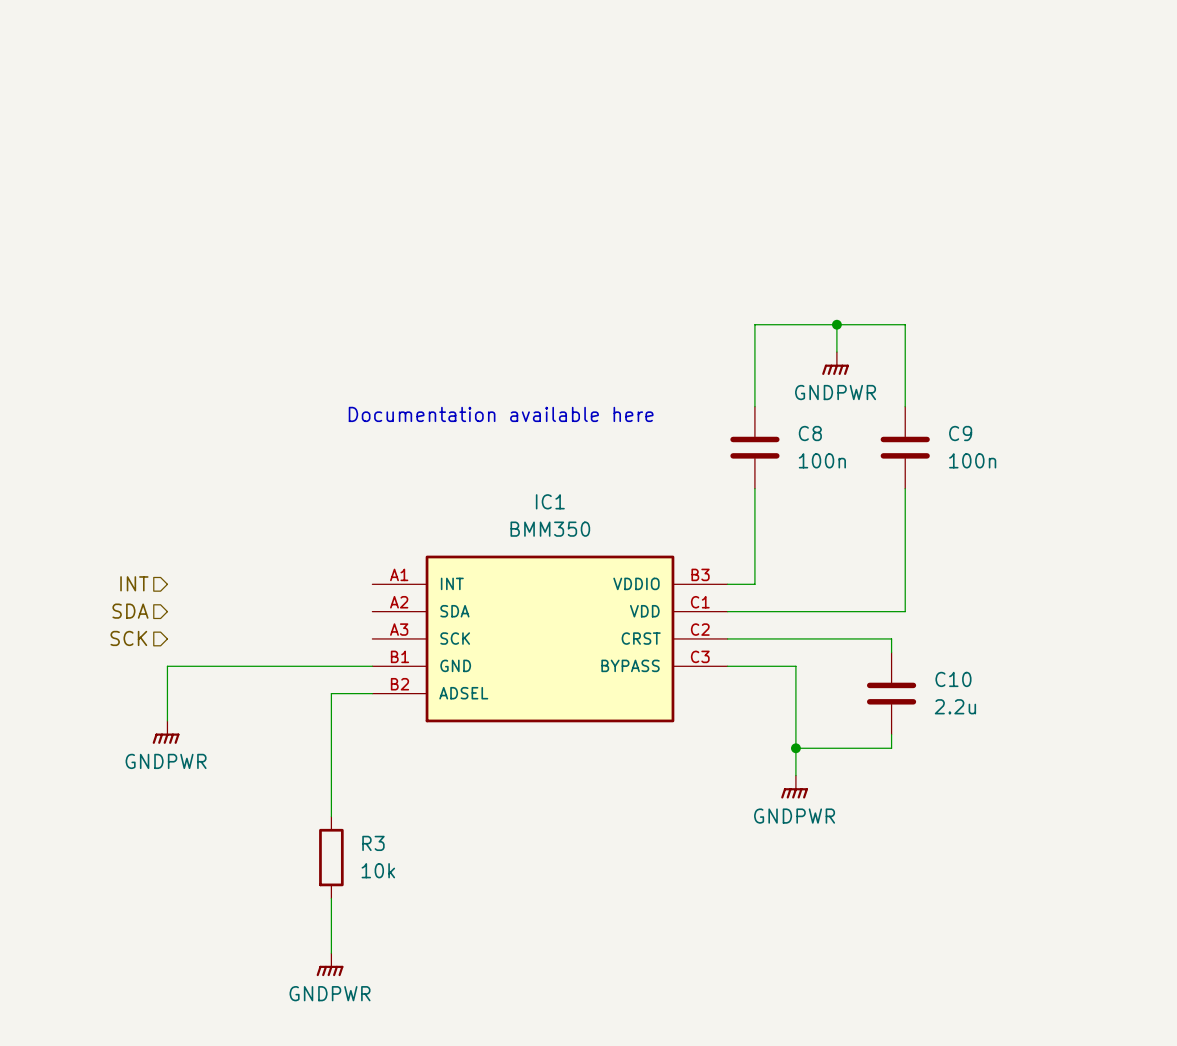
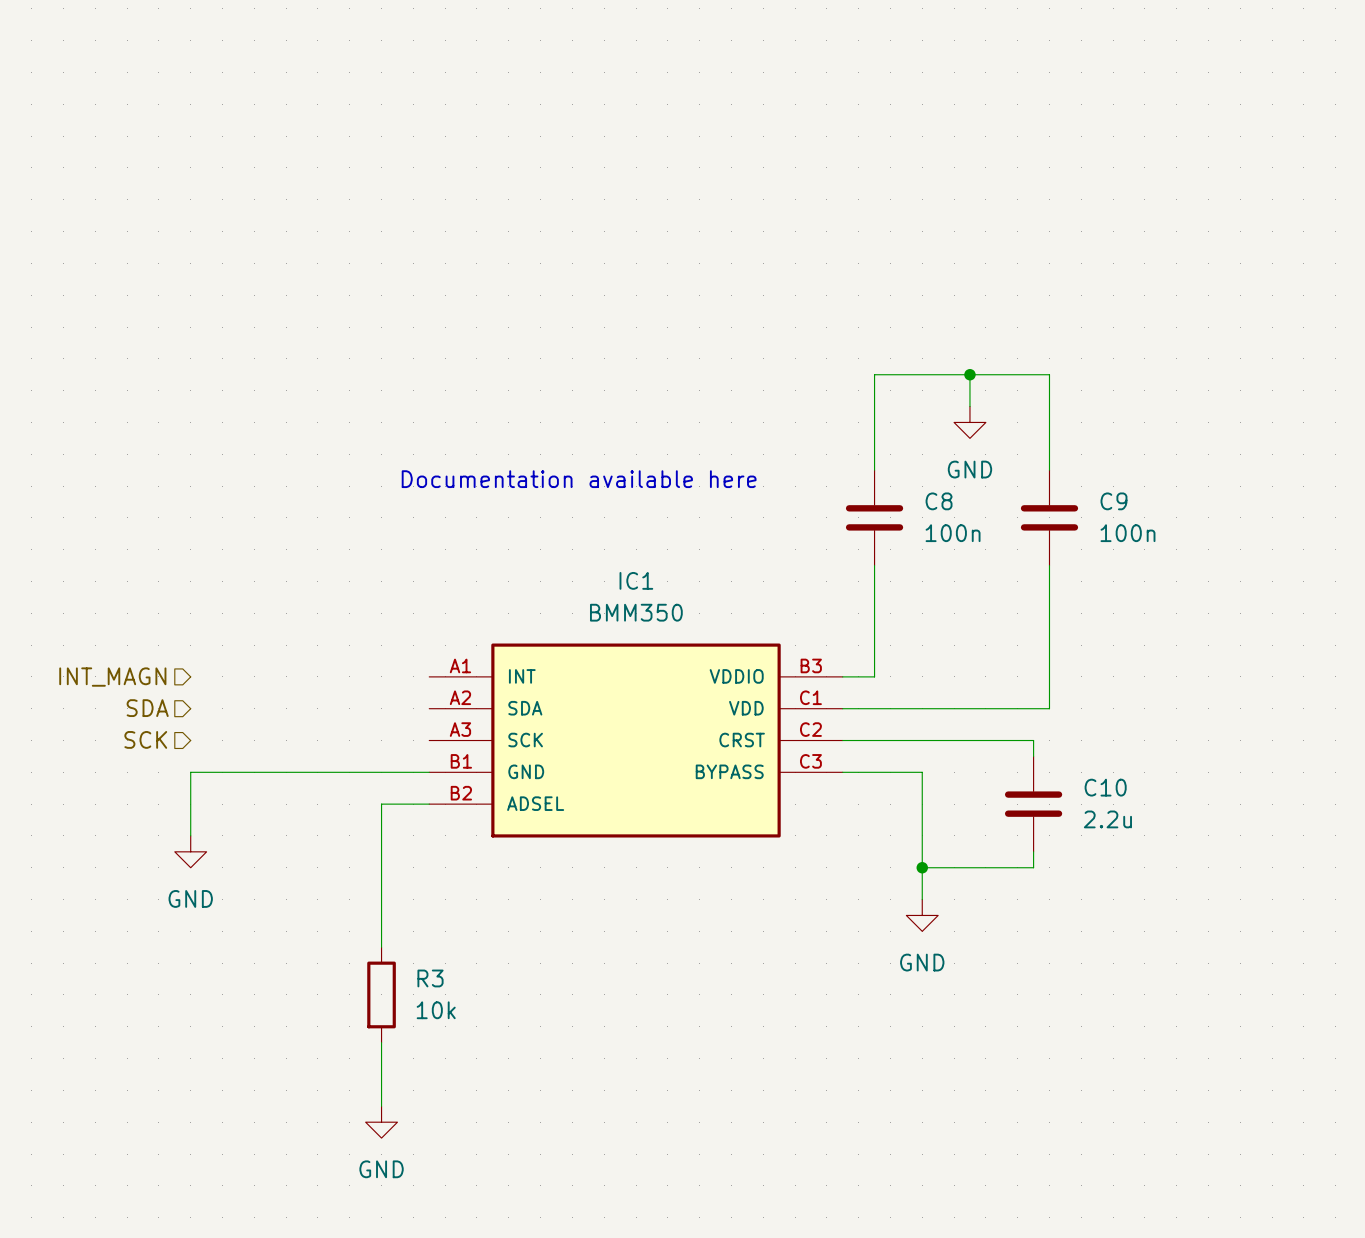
power symbol: GNDPWR (835, 363) -> GND (969, 422)
hierarchical label: INT (134, 583) -> INT_MAGN (112, 677)
power symbol: GNDPWR (166, 732) -> GND (190, 851)
power symbol: GNDPWR (794, 787) -> GND (922, 915)
power symbol: GNDPWR (330, 964) -> GND (381, 1122)

